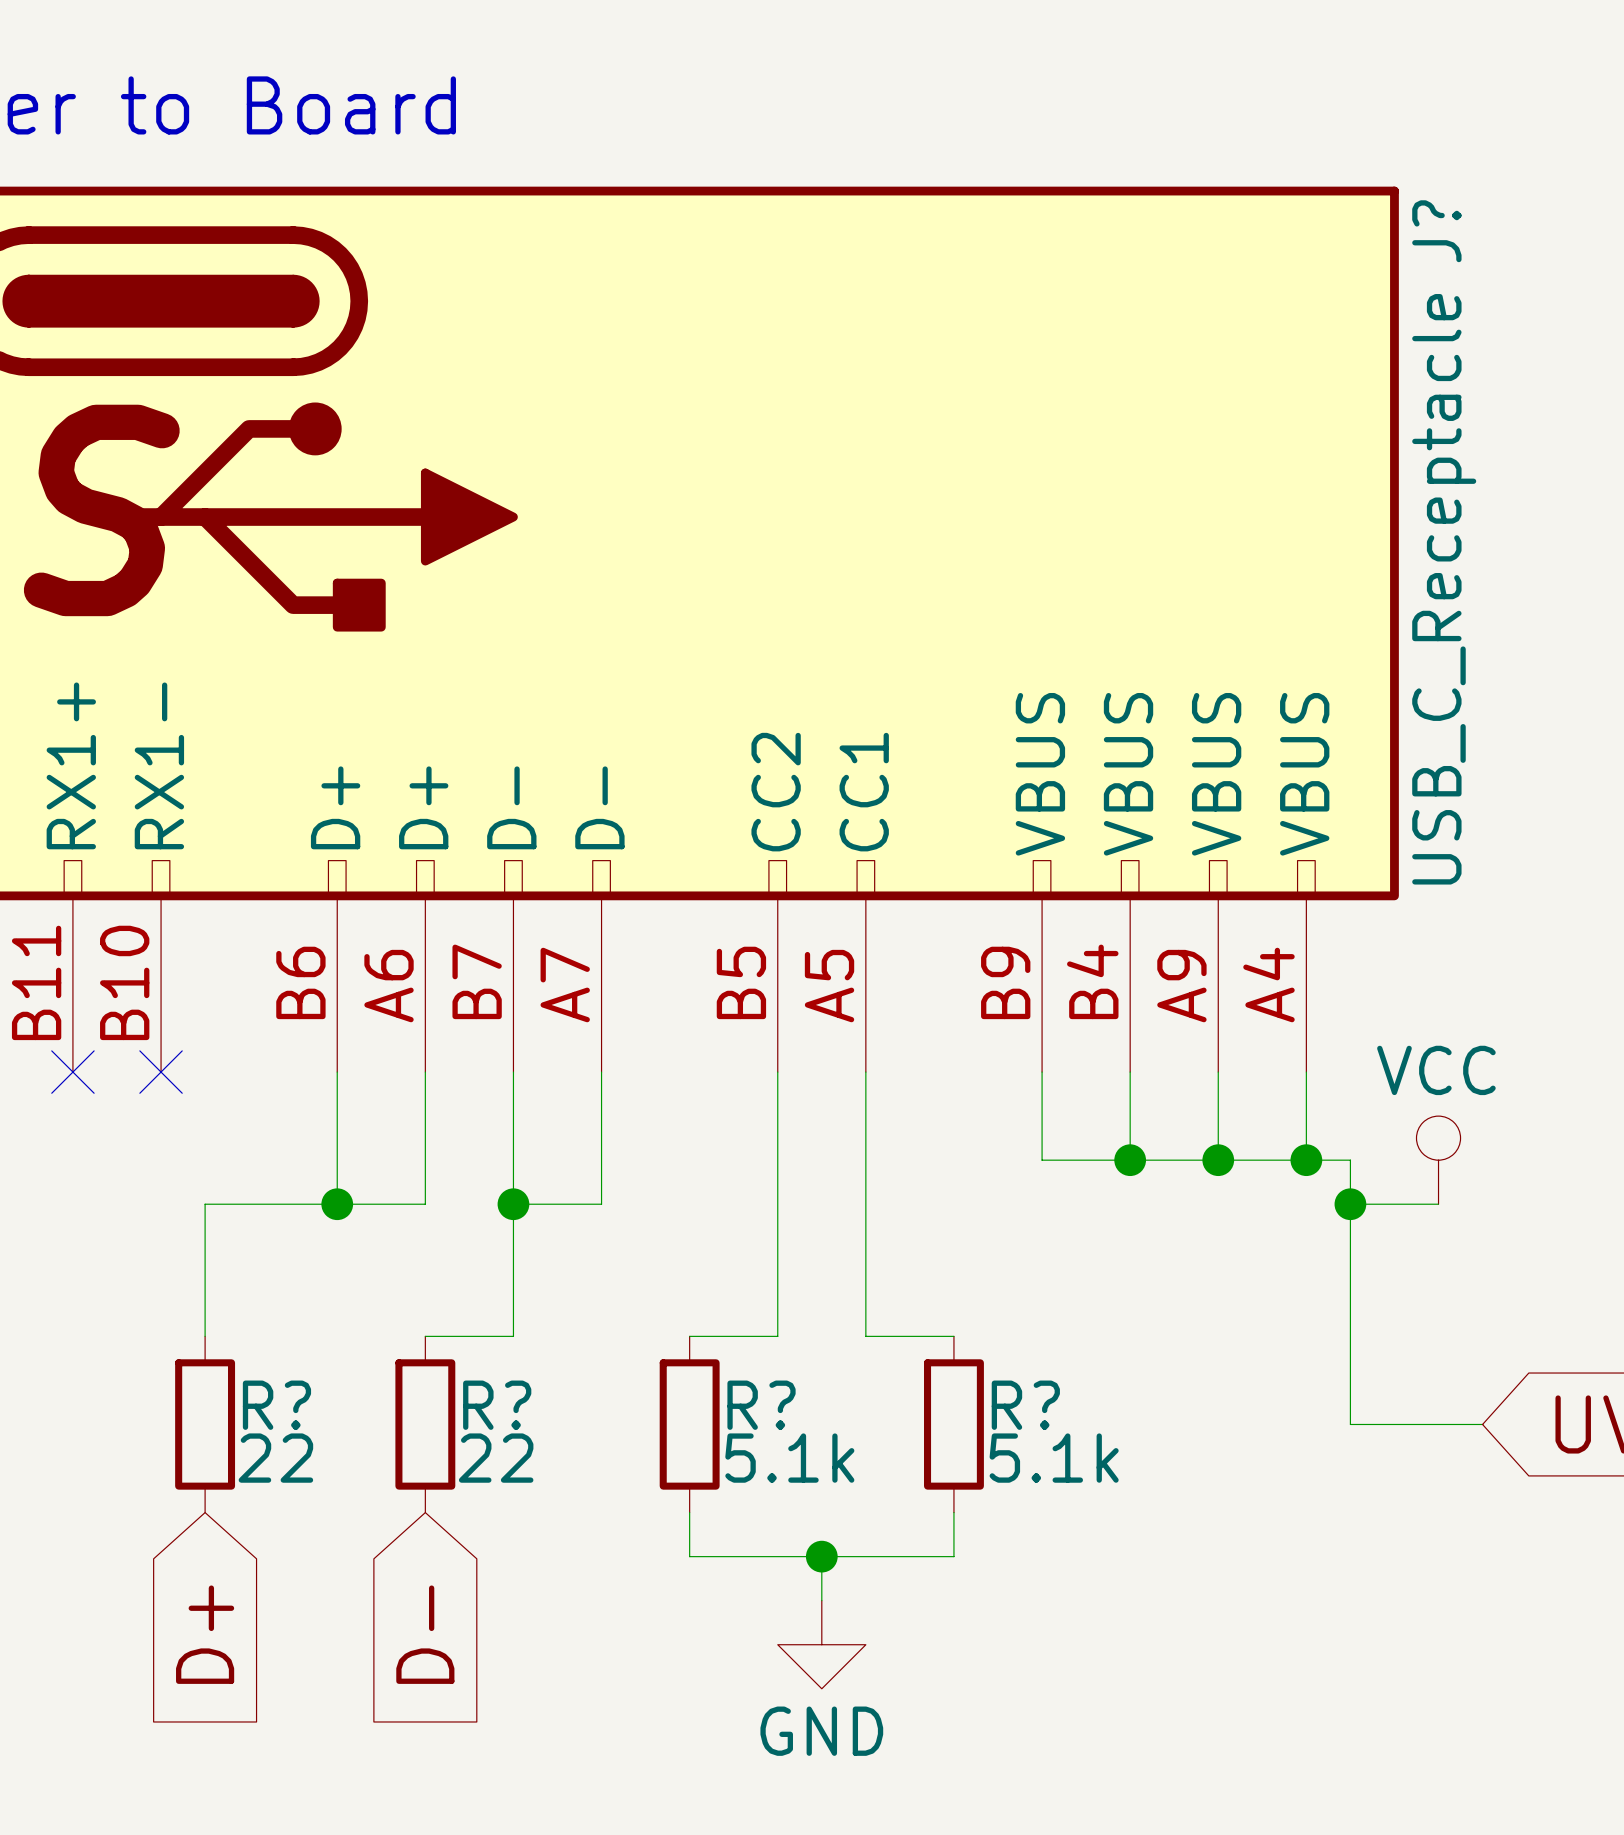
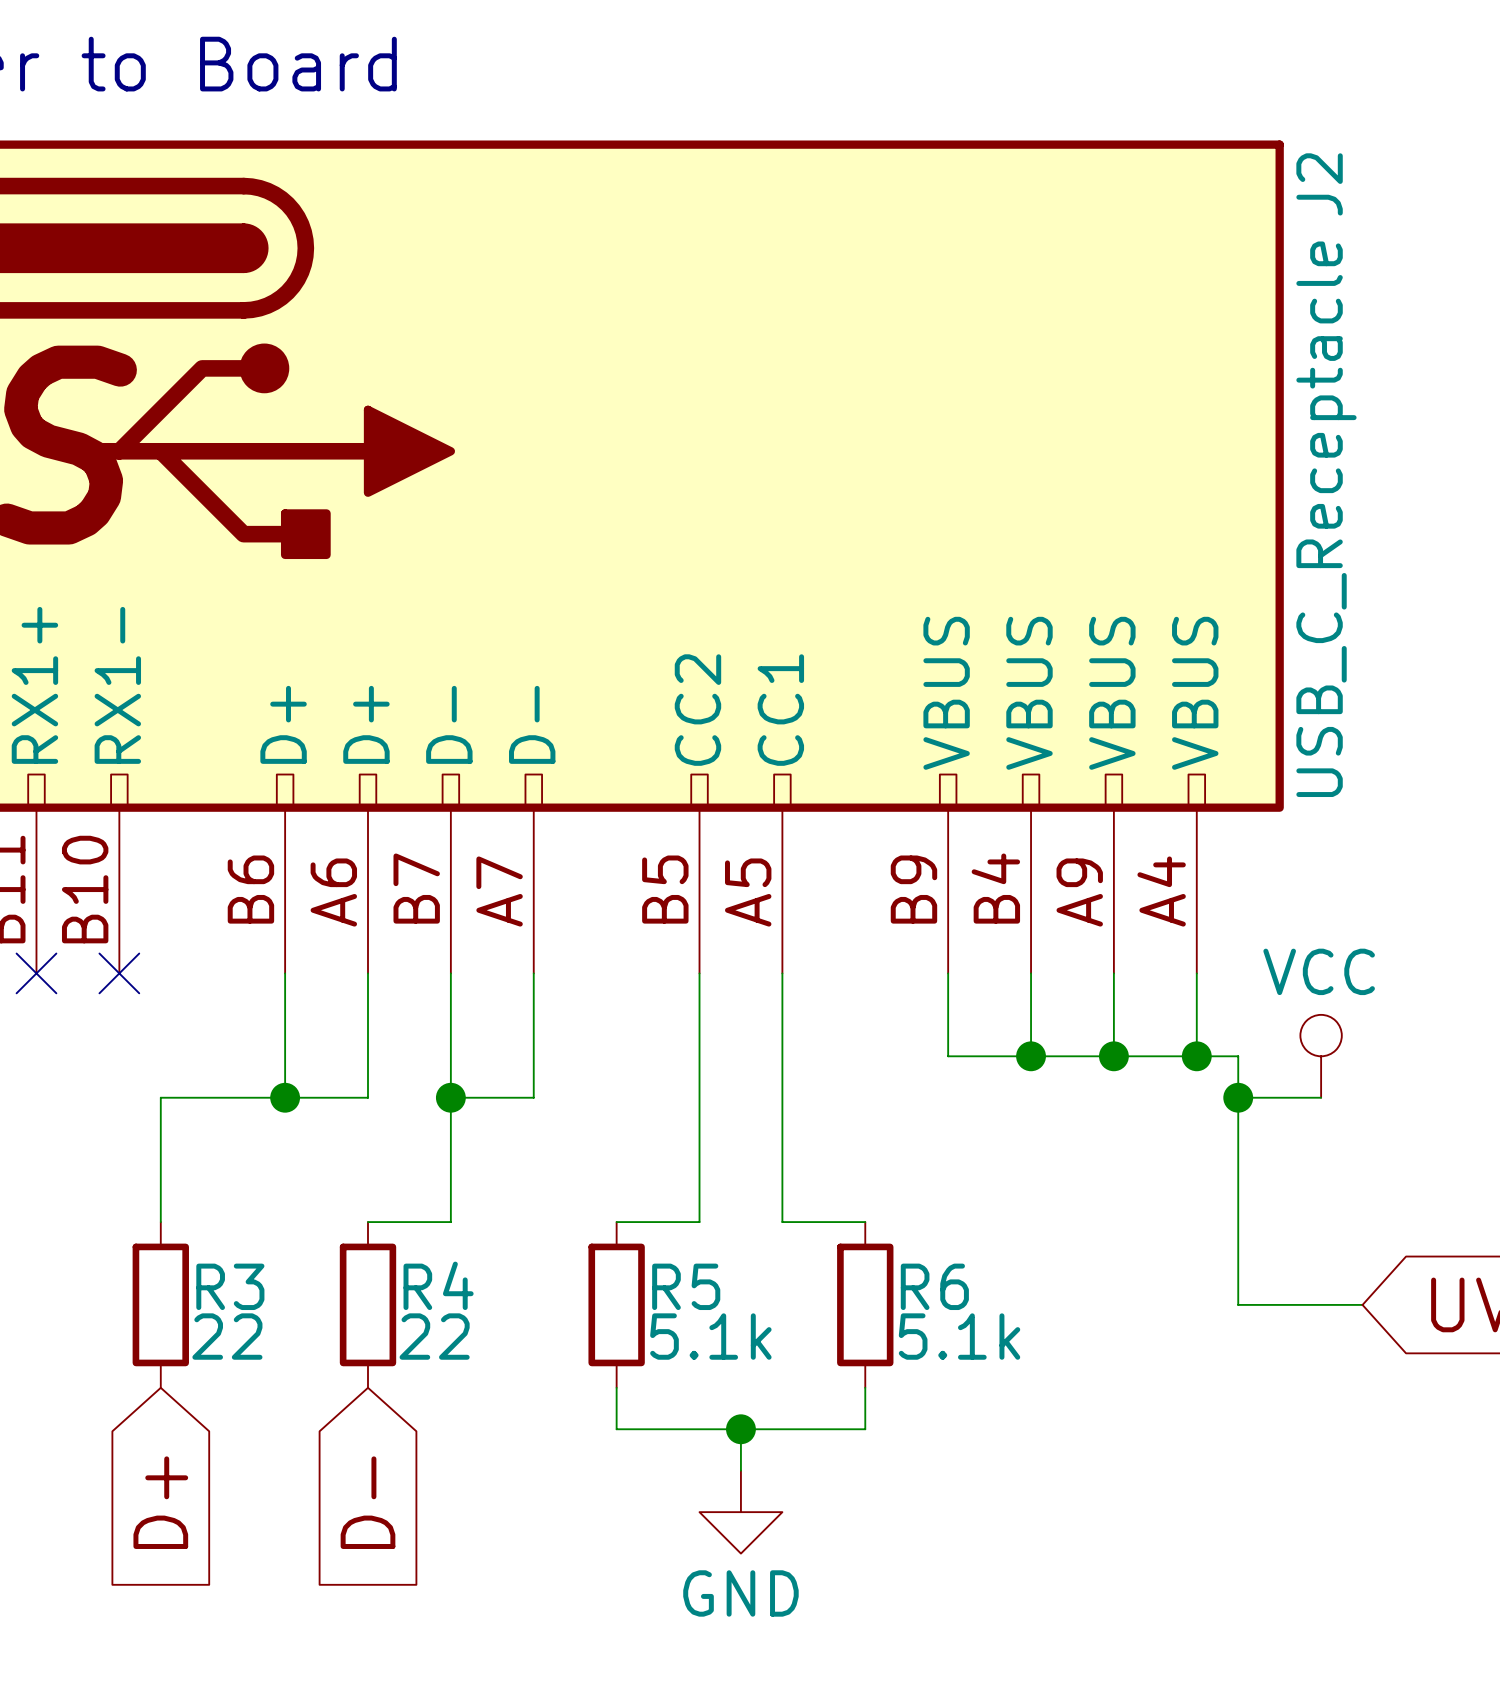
J? name: J? (1436, 231) -> J2 (1319, 184)
R? name: R? (276, 1405) -> R3 (230, 1286)
R? name: R? (497, 1405) -> R4 (438, 1285)
R? name: R? (761, 1405) -> R5 (686, 1286)
R? name: R? (1025, 1405) -> R6 (934, 1286)

